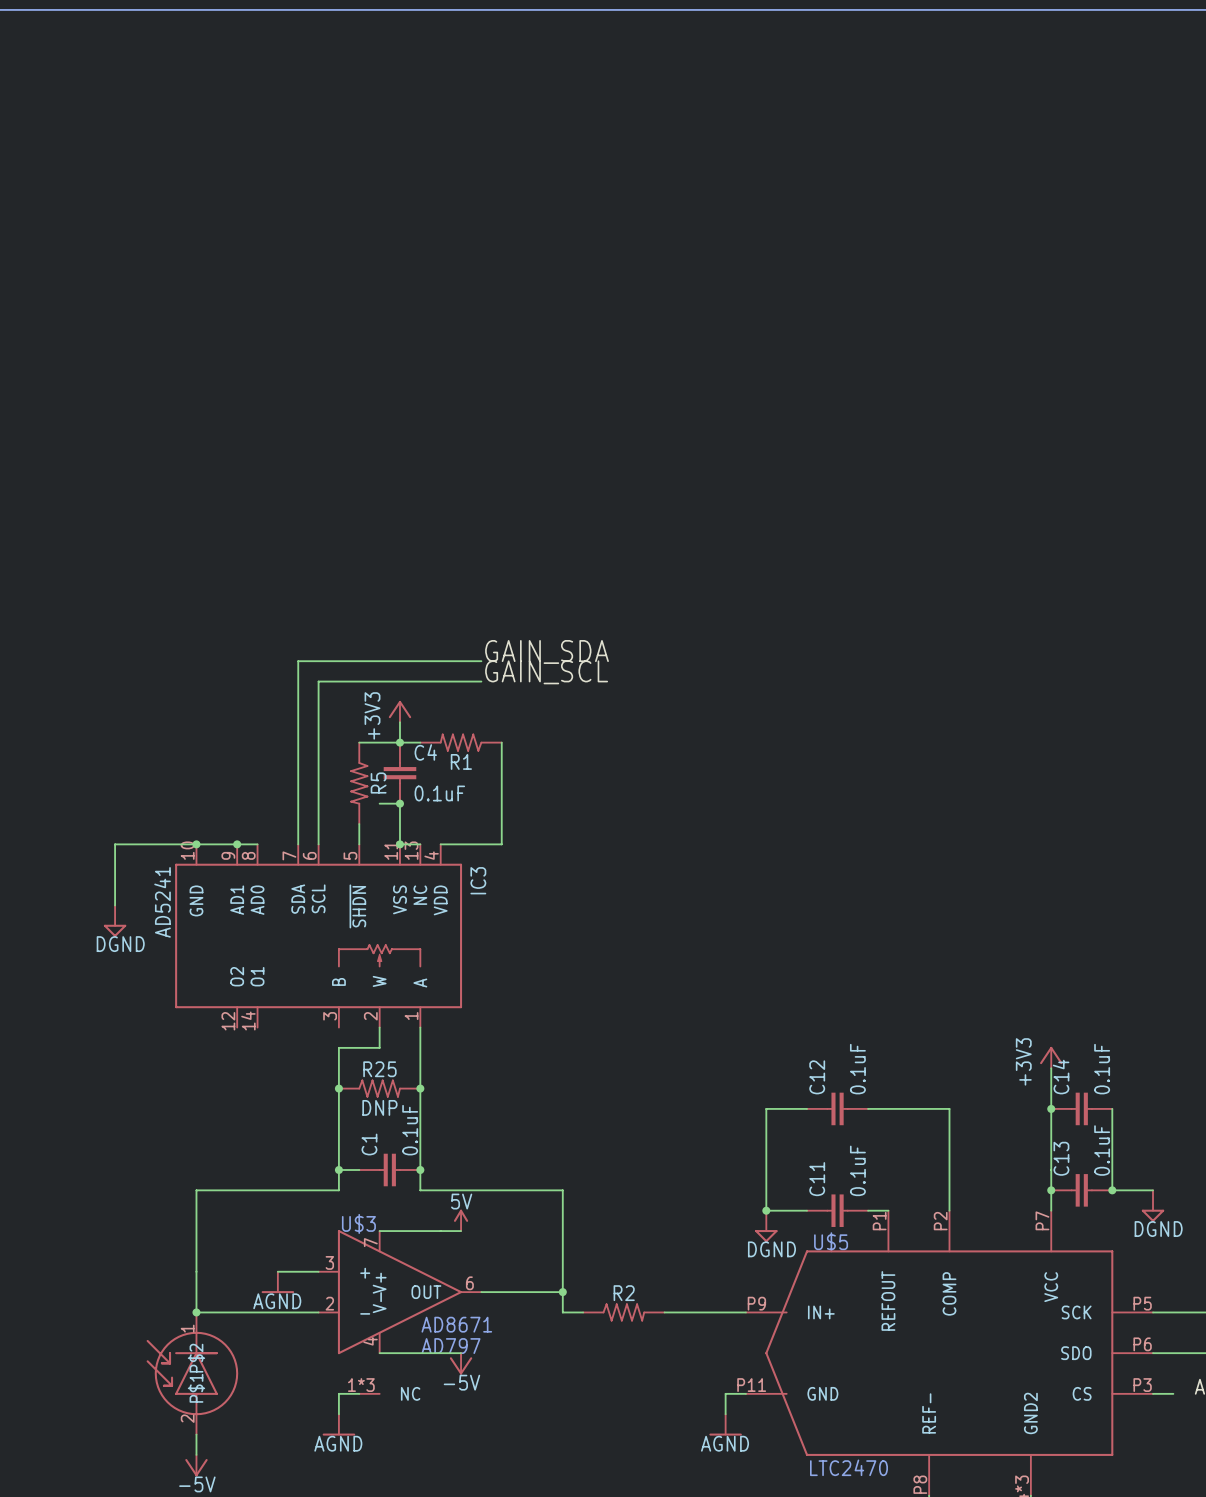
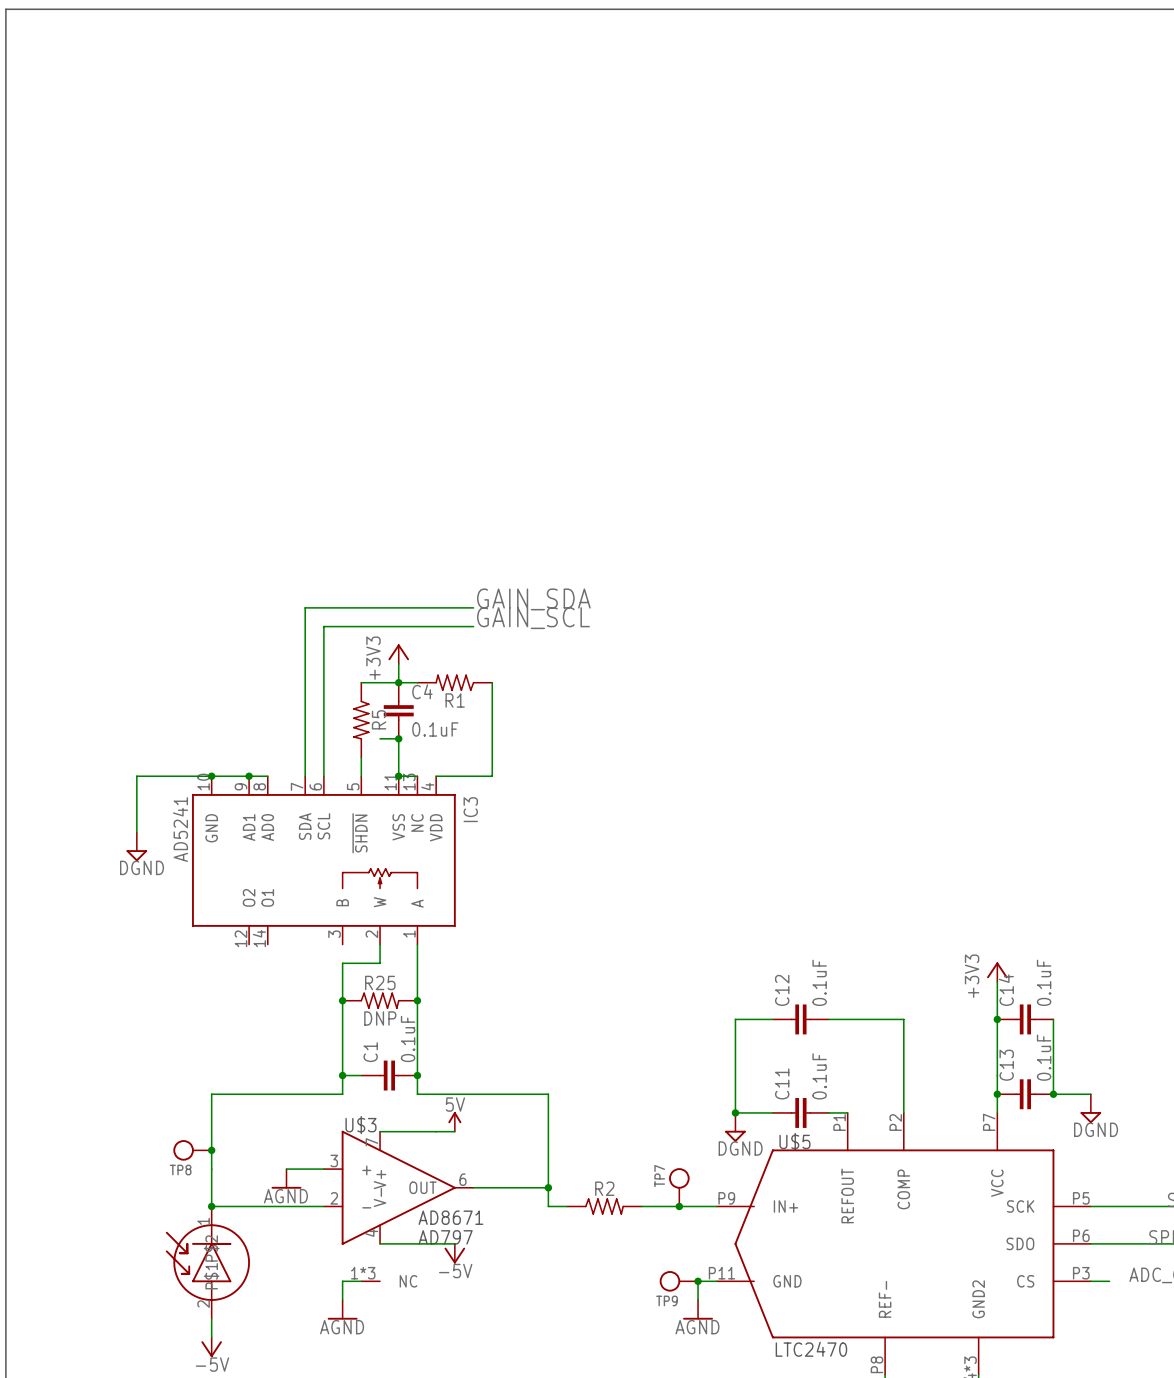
TP8: none -> (192, 1150)
junction: none -> (211, 1150)
TP7: none -> (679, 1187)
junction: none -> (679, 1206)
TP9: none -> (678, 1281)
junction: none -> (698, 1281)

